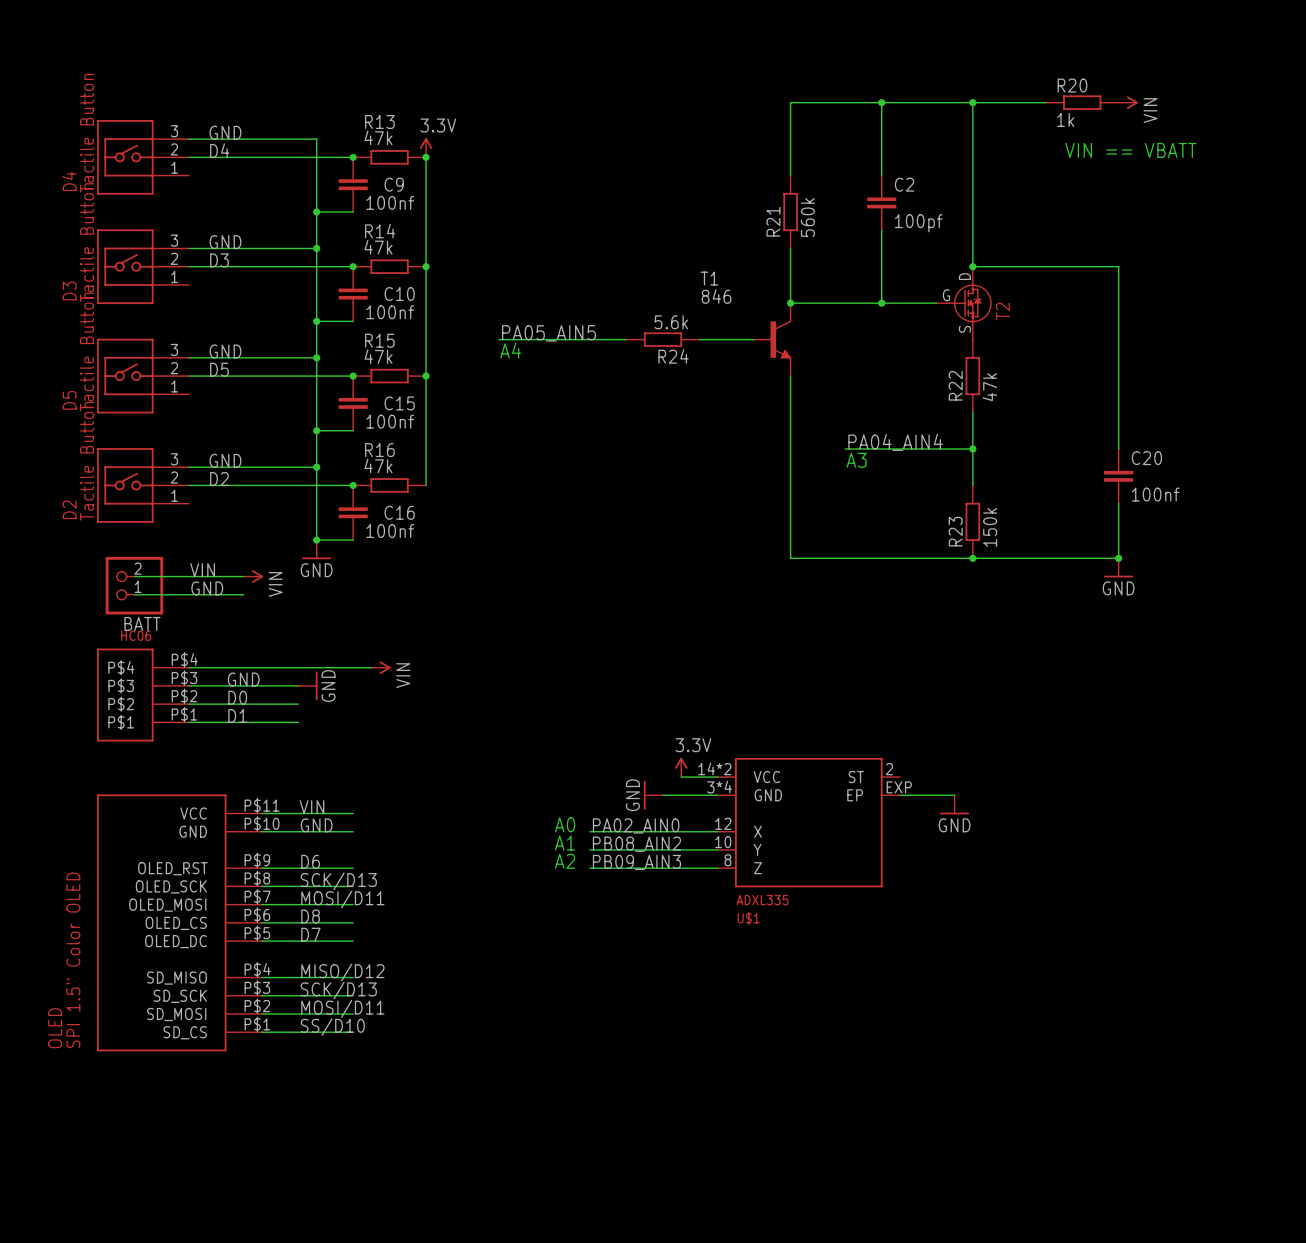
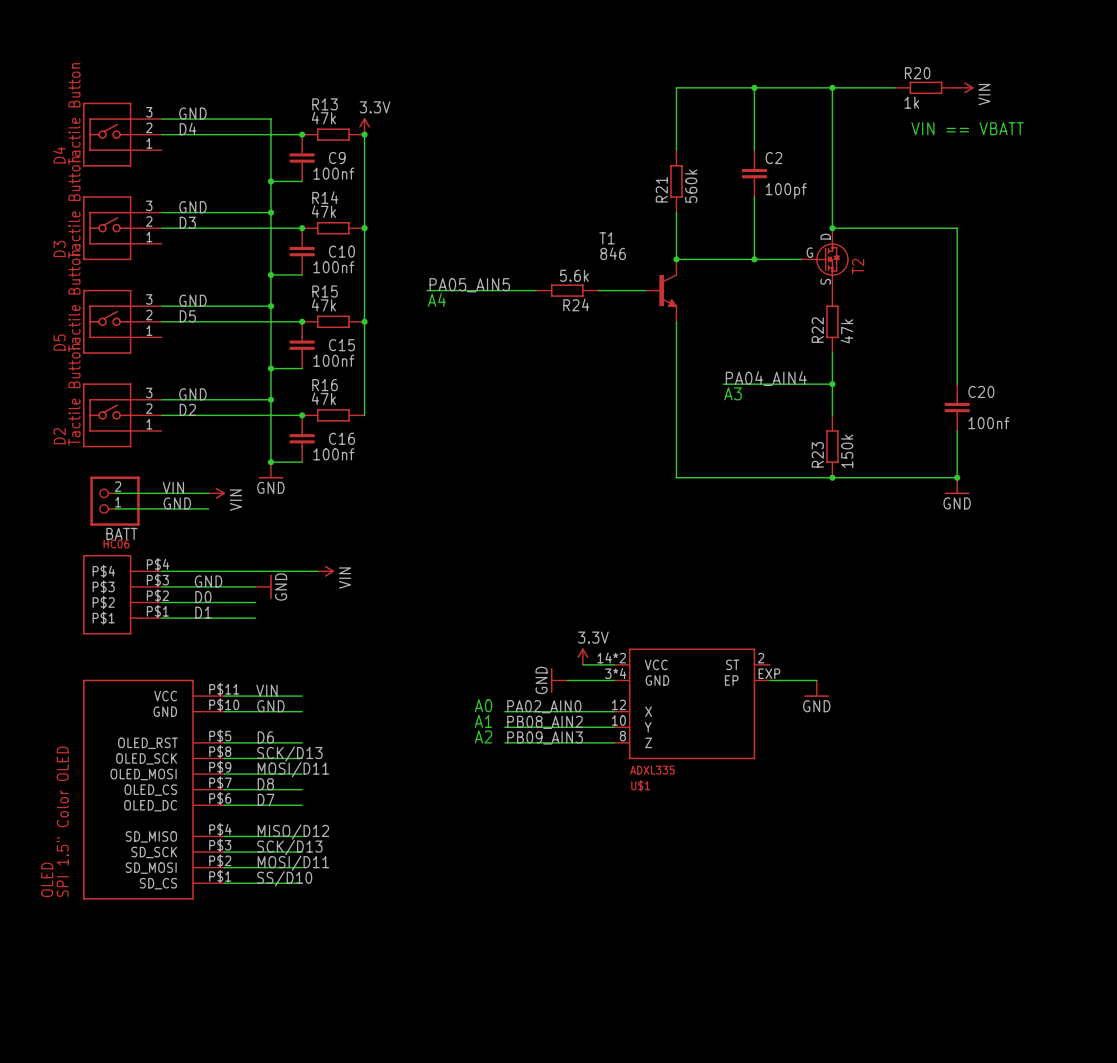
OLED pin number: P$9 (257, 860) -> P$5 (220, 736)
OLED pin number: P$7 (257, 896) -> P$9 (220, 767)
OLED pin number: P$6 (257, 914) -> P$7 (220, 782)
OLED pin number: P$5 (257, 933) -> P$6 (220, 798)

